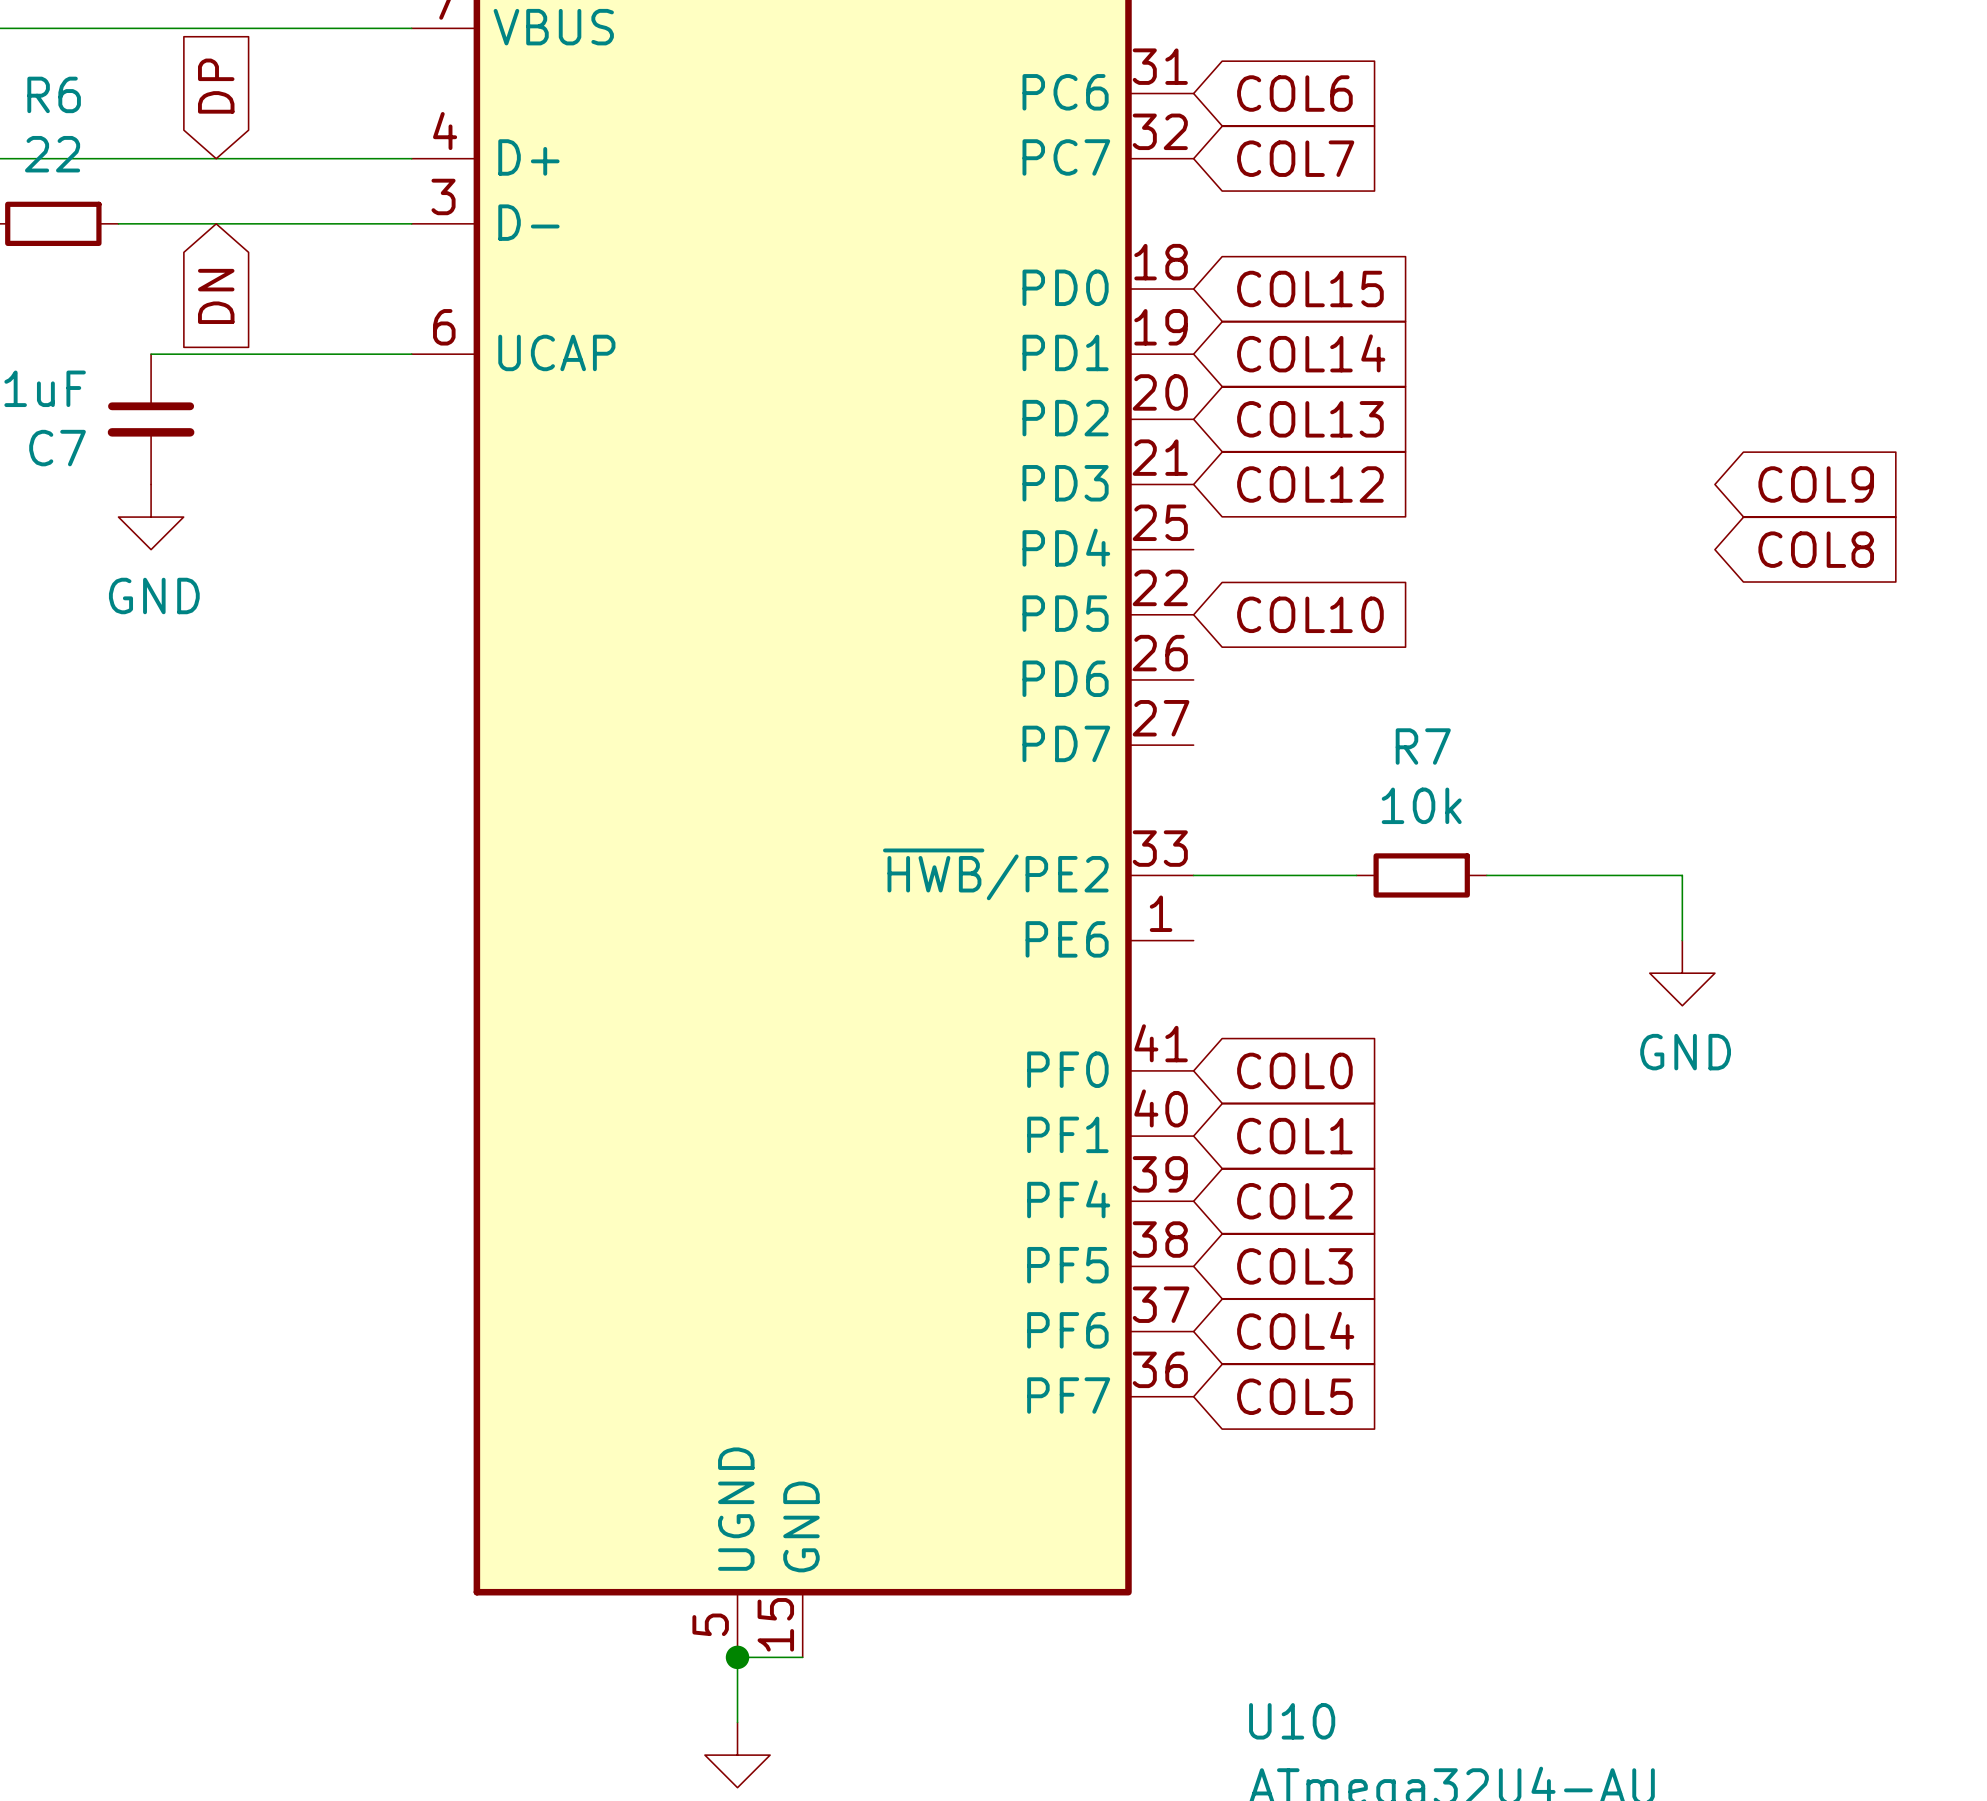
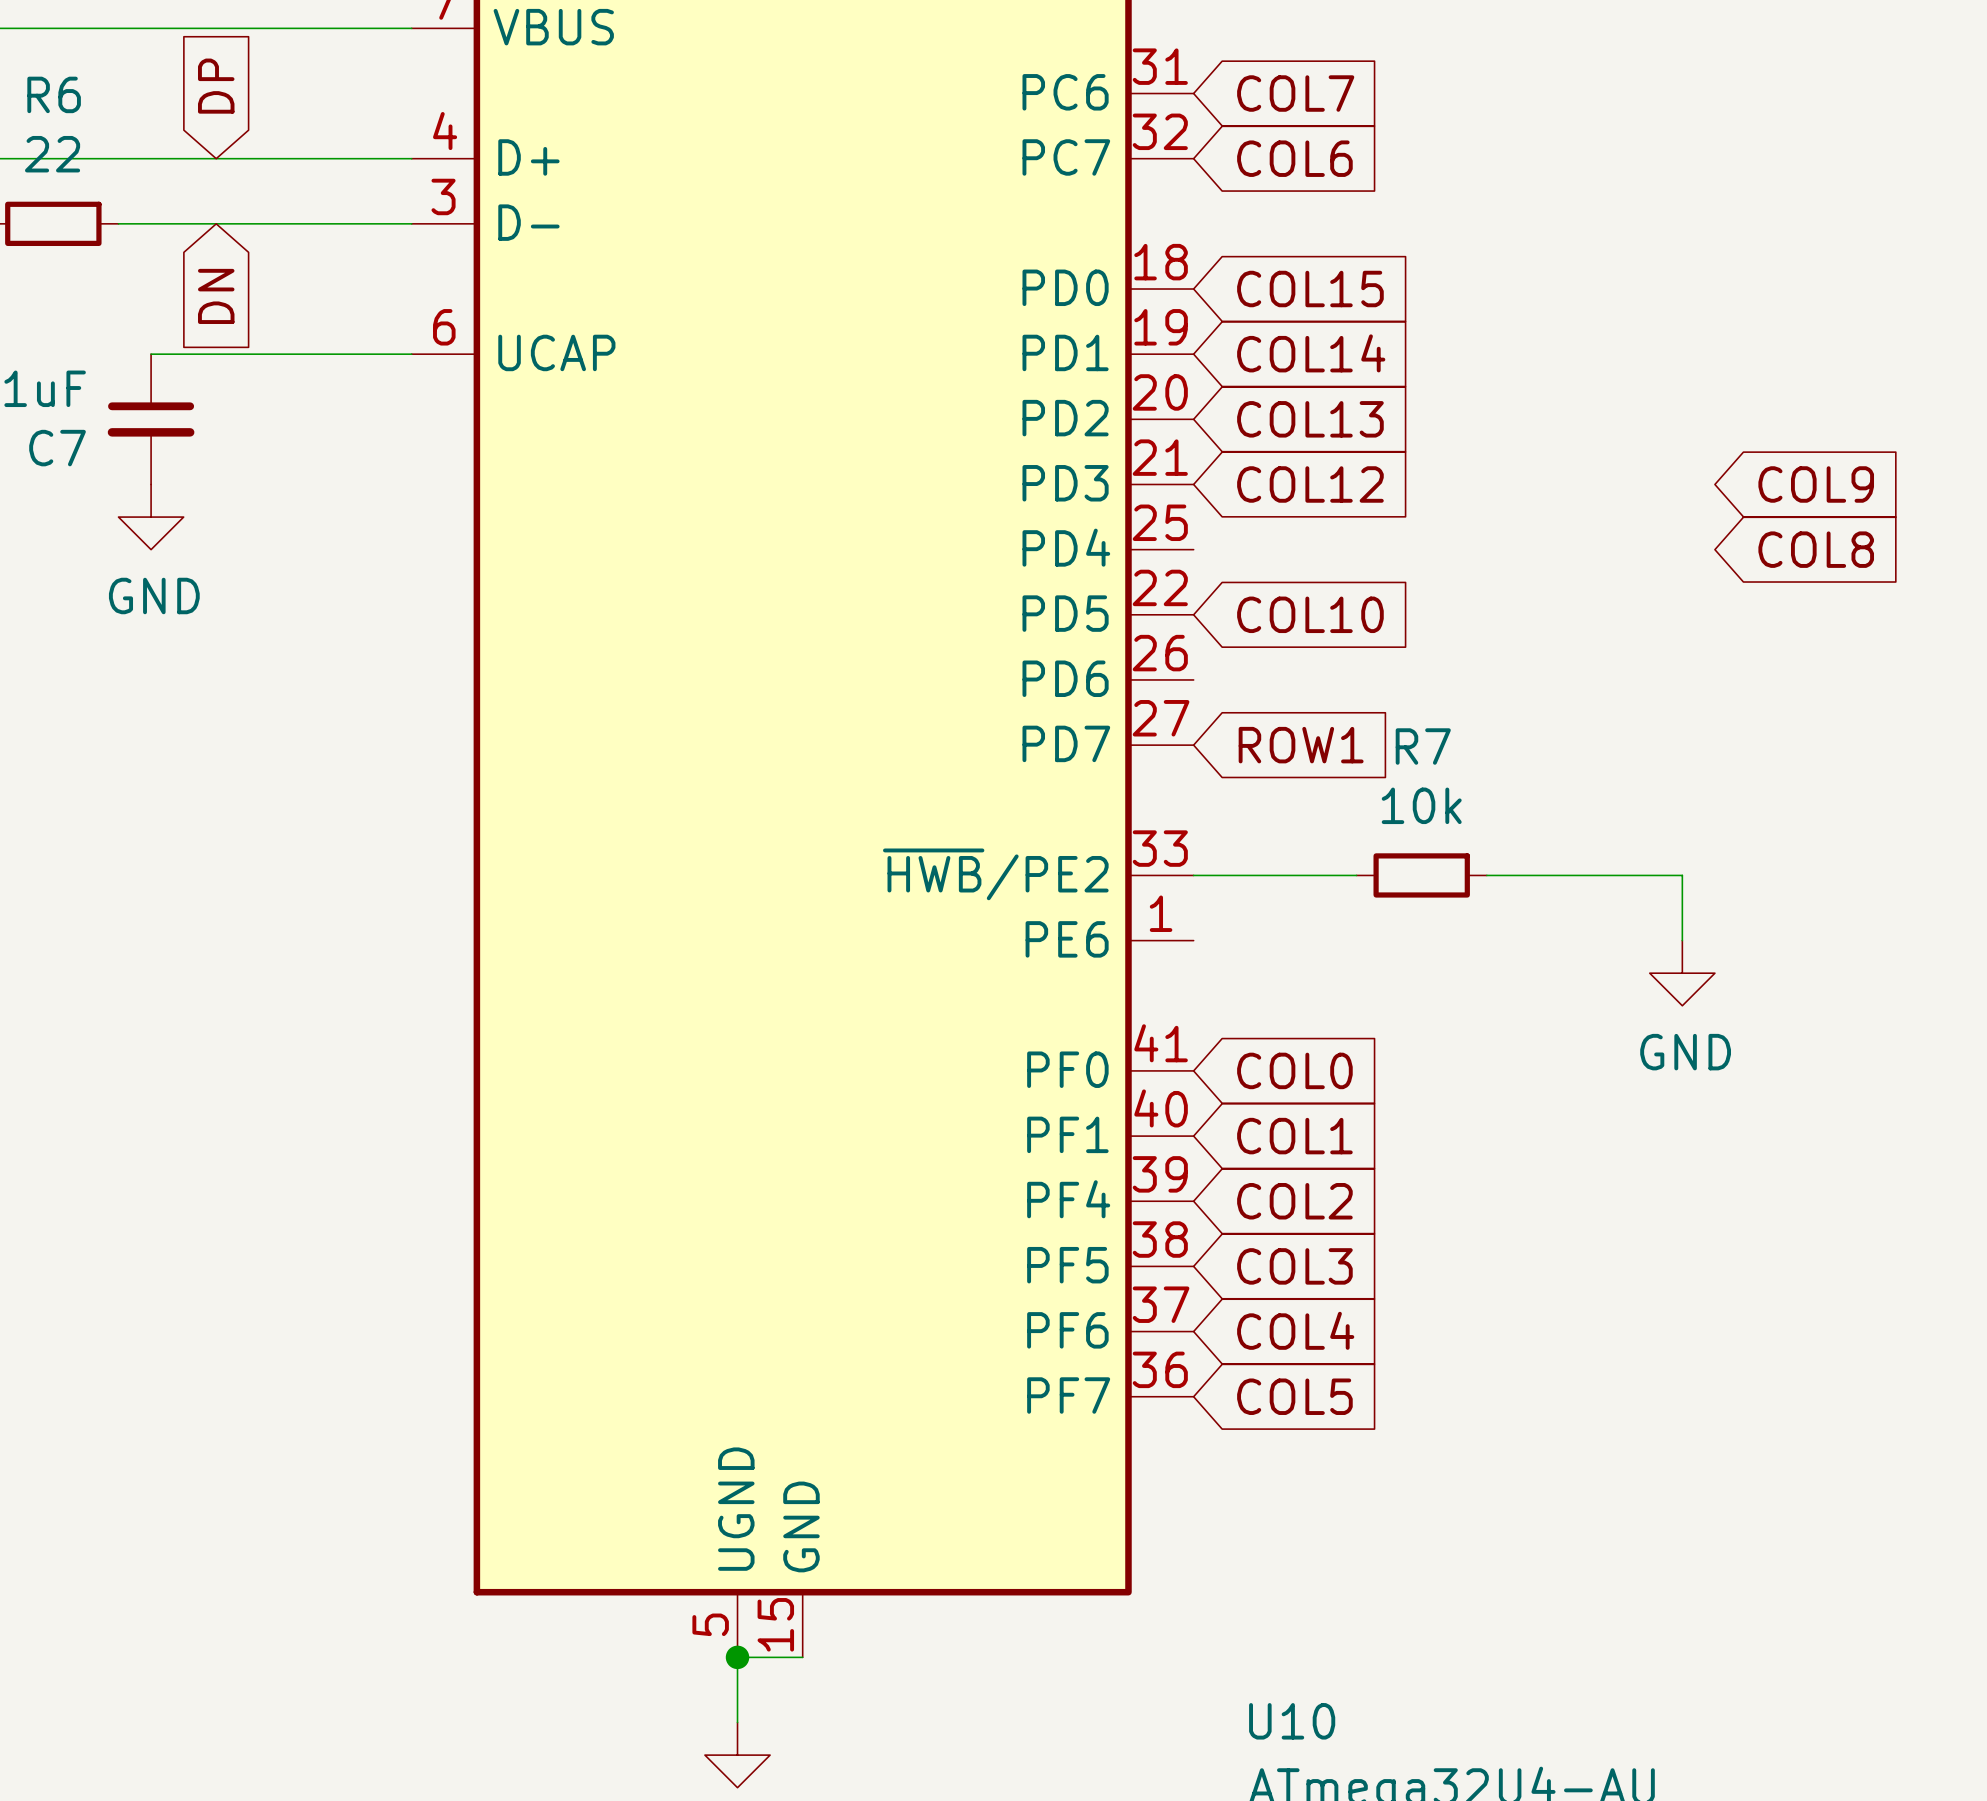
global label: COL6 (1294, 93) -> COL7 (1295, 93)
global label: COL7 (1295, 158) -> COL6 (1294, 158)
global label: none -> ROW1 (1301, 745)

